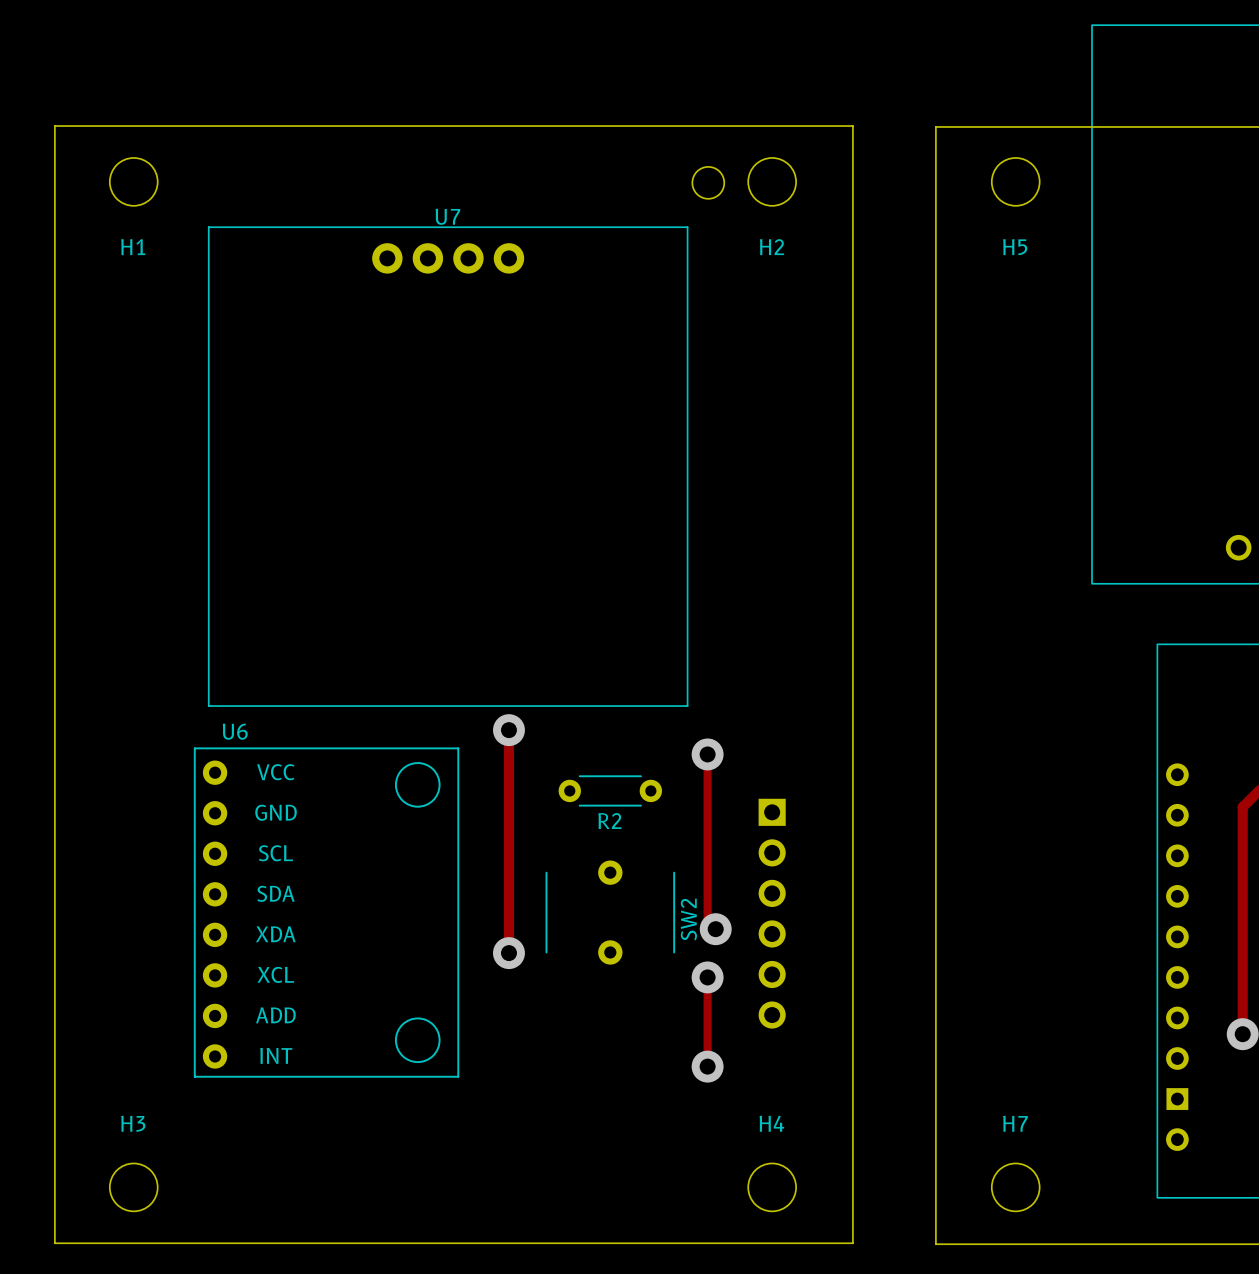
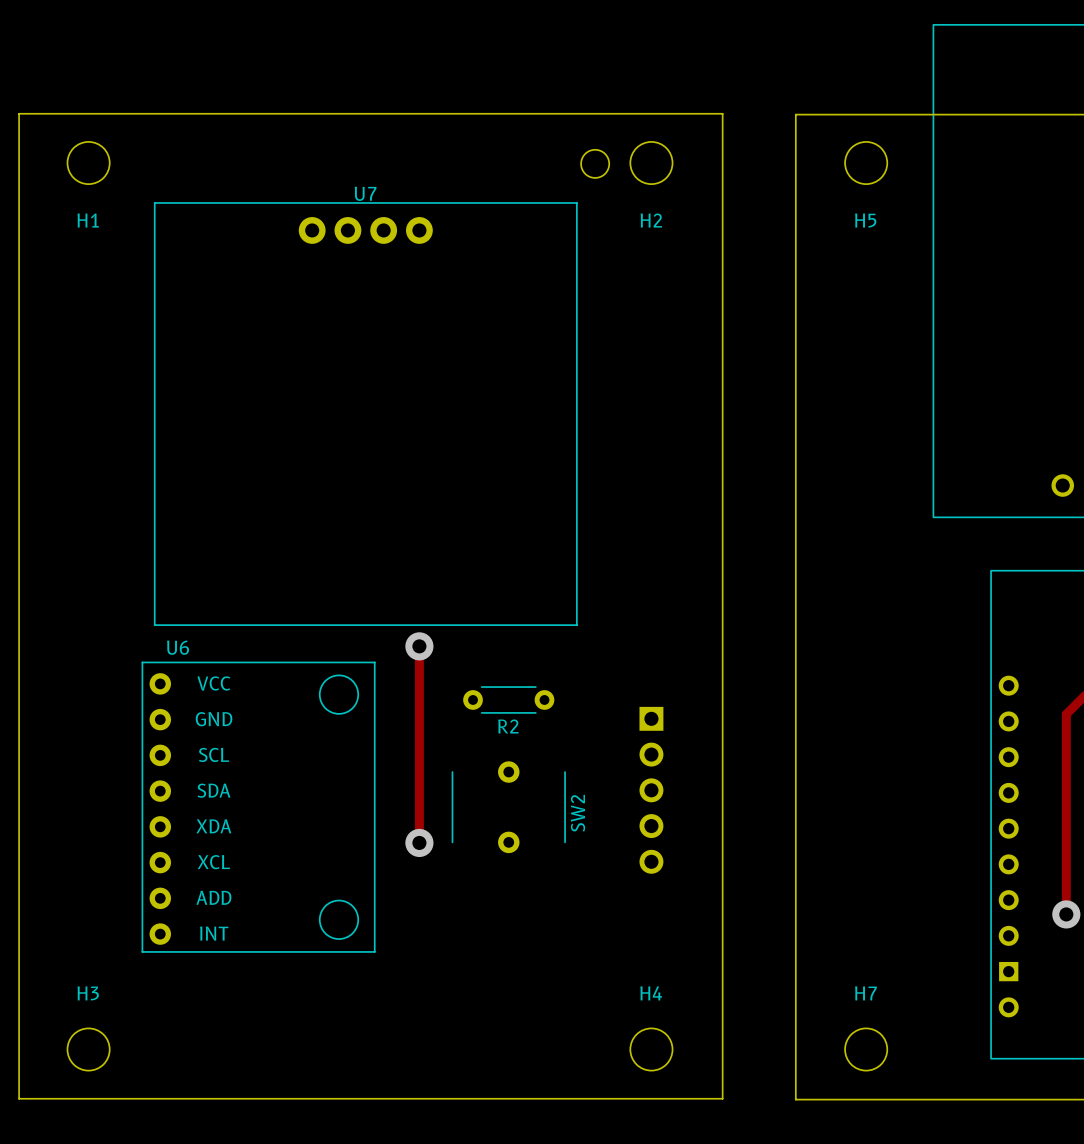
track: (707, 754) (707, 921) (715, 929) -> none
via: (707, 754) -> none
part: (772, 913) -> none
via: (715, 929) -> none
track: (707, 977) (707, 1066) -> none
via: (707, 977) -> none
via: (707, 1066) -> none

